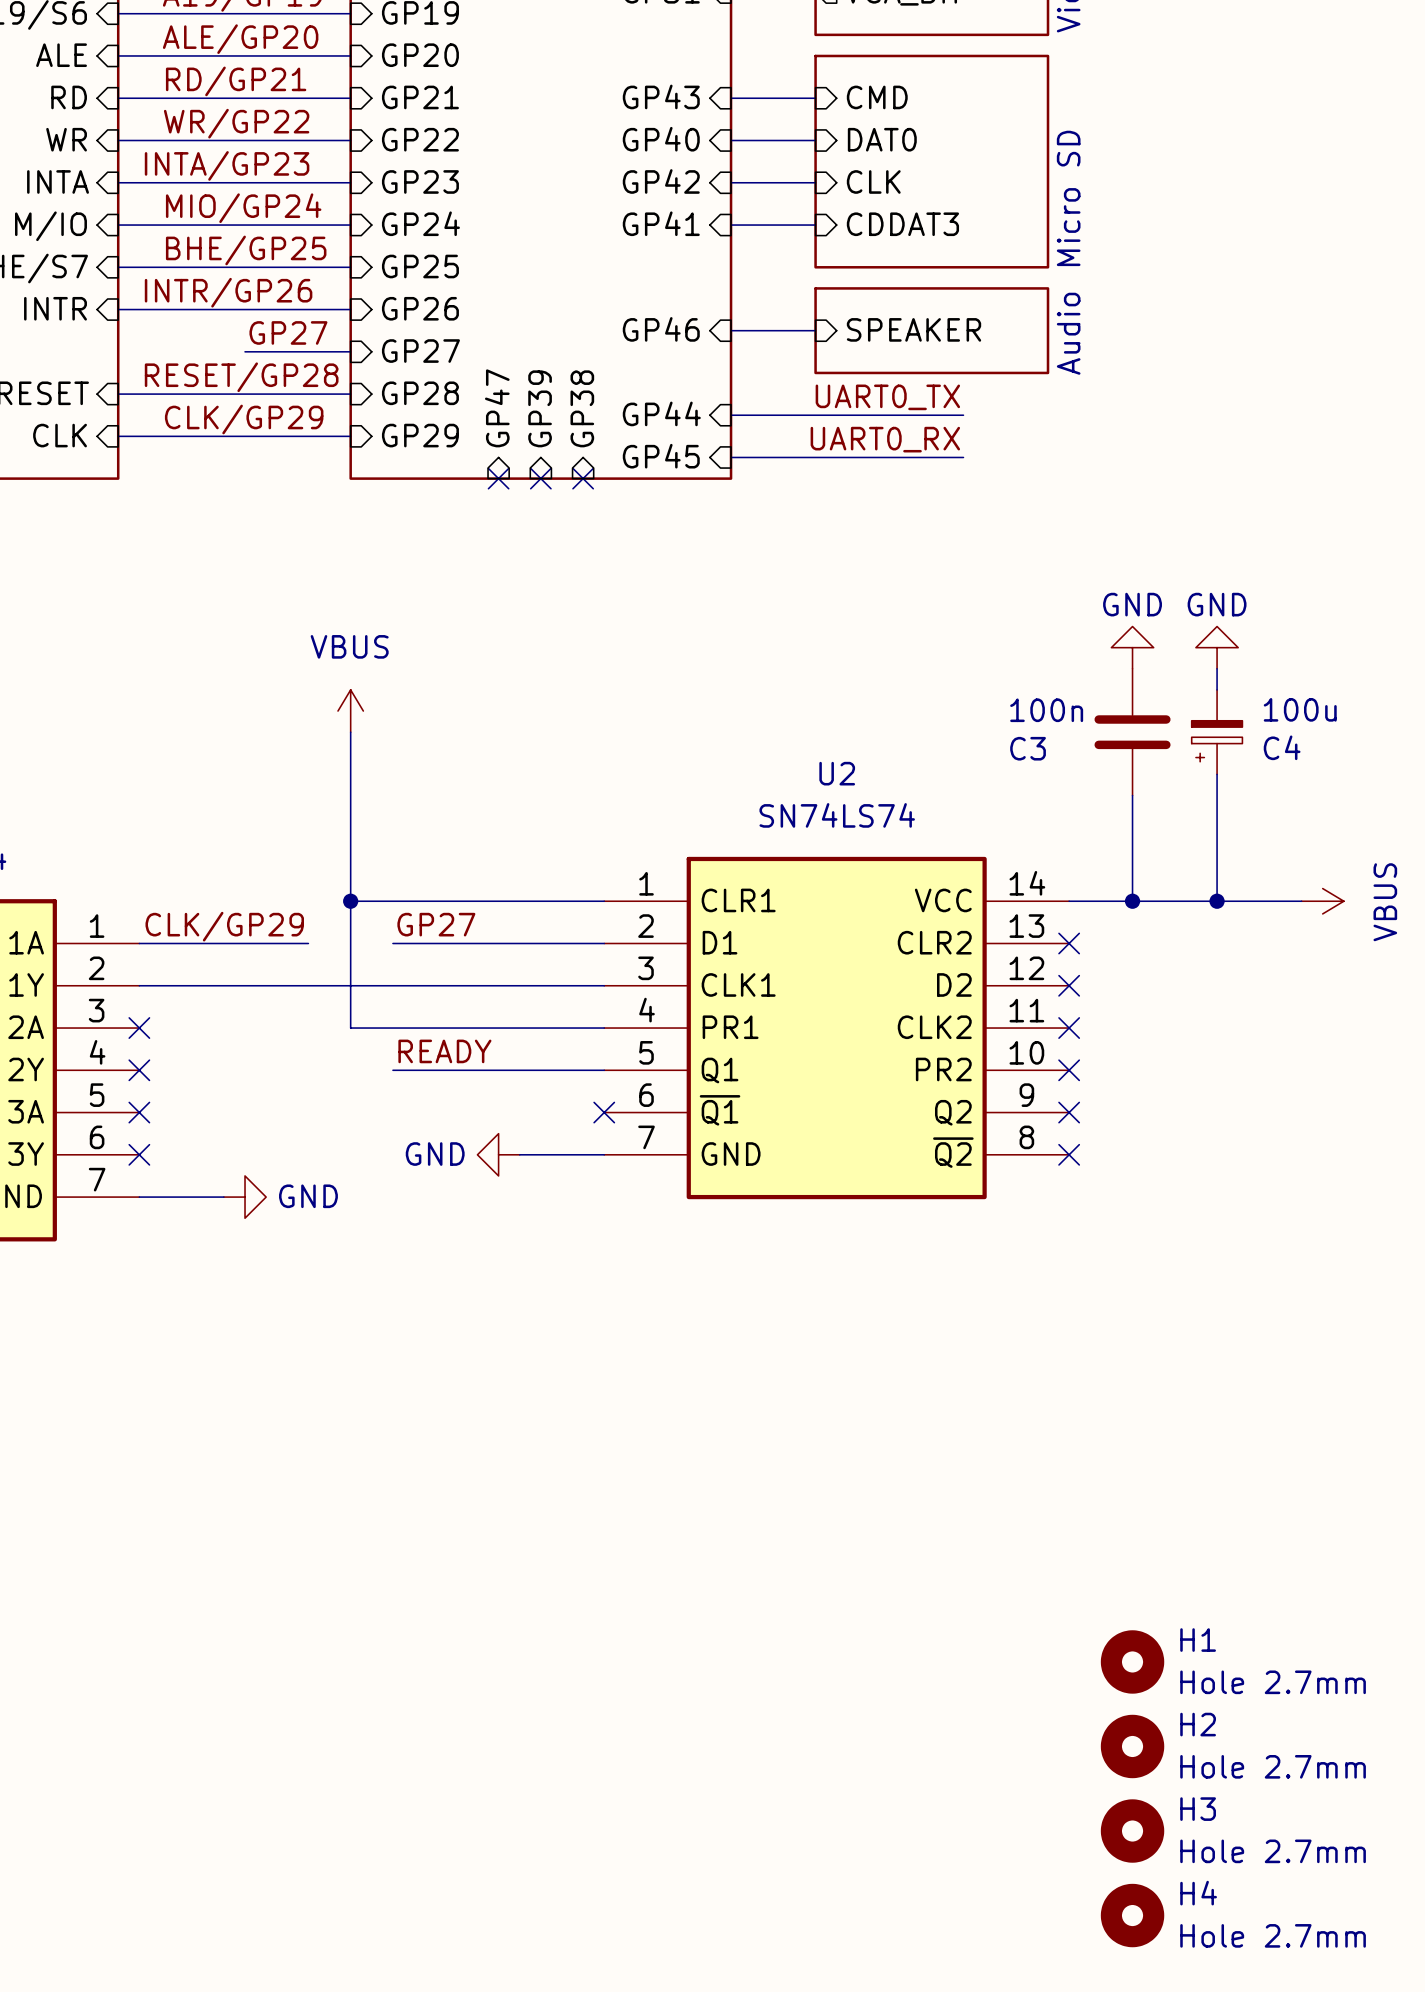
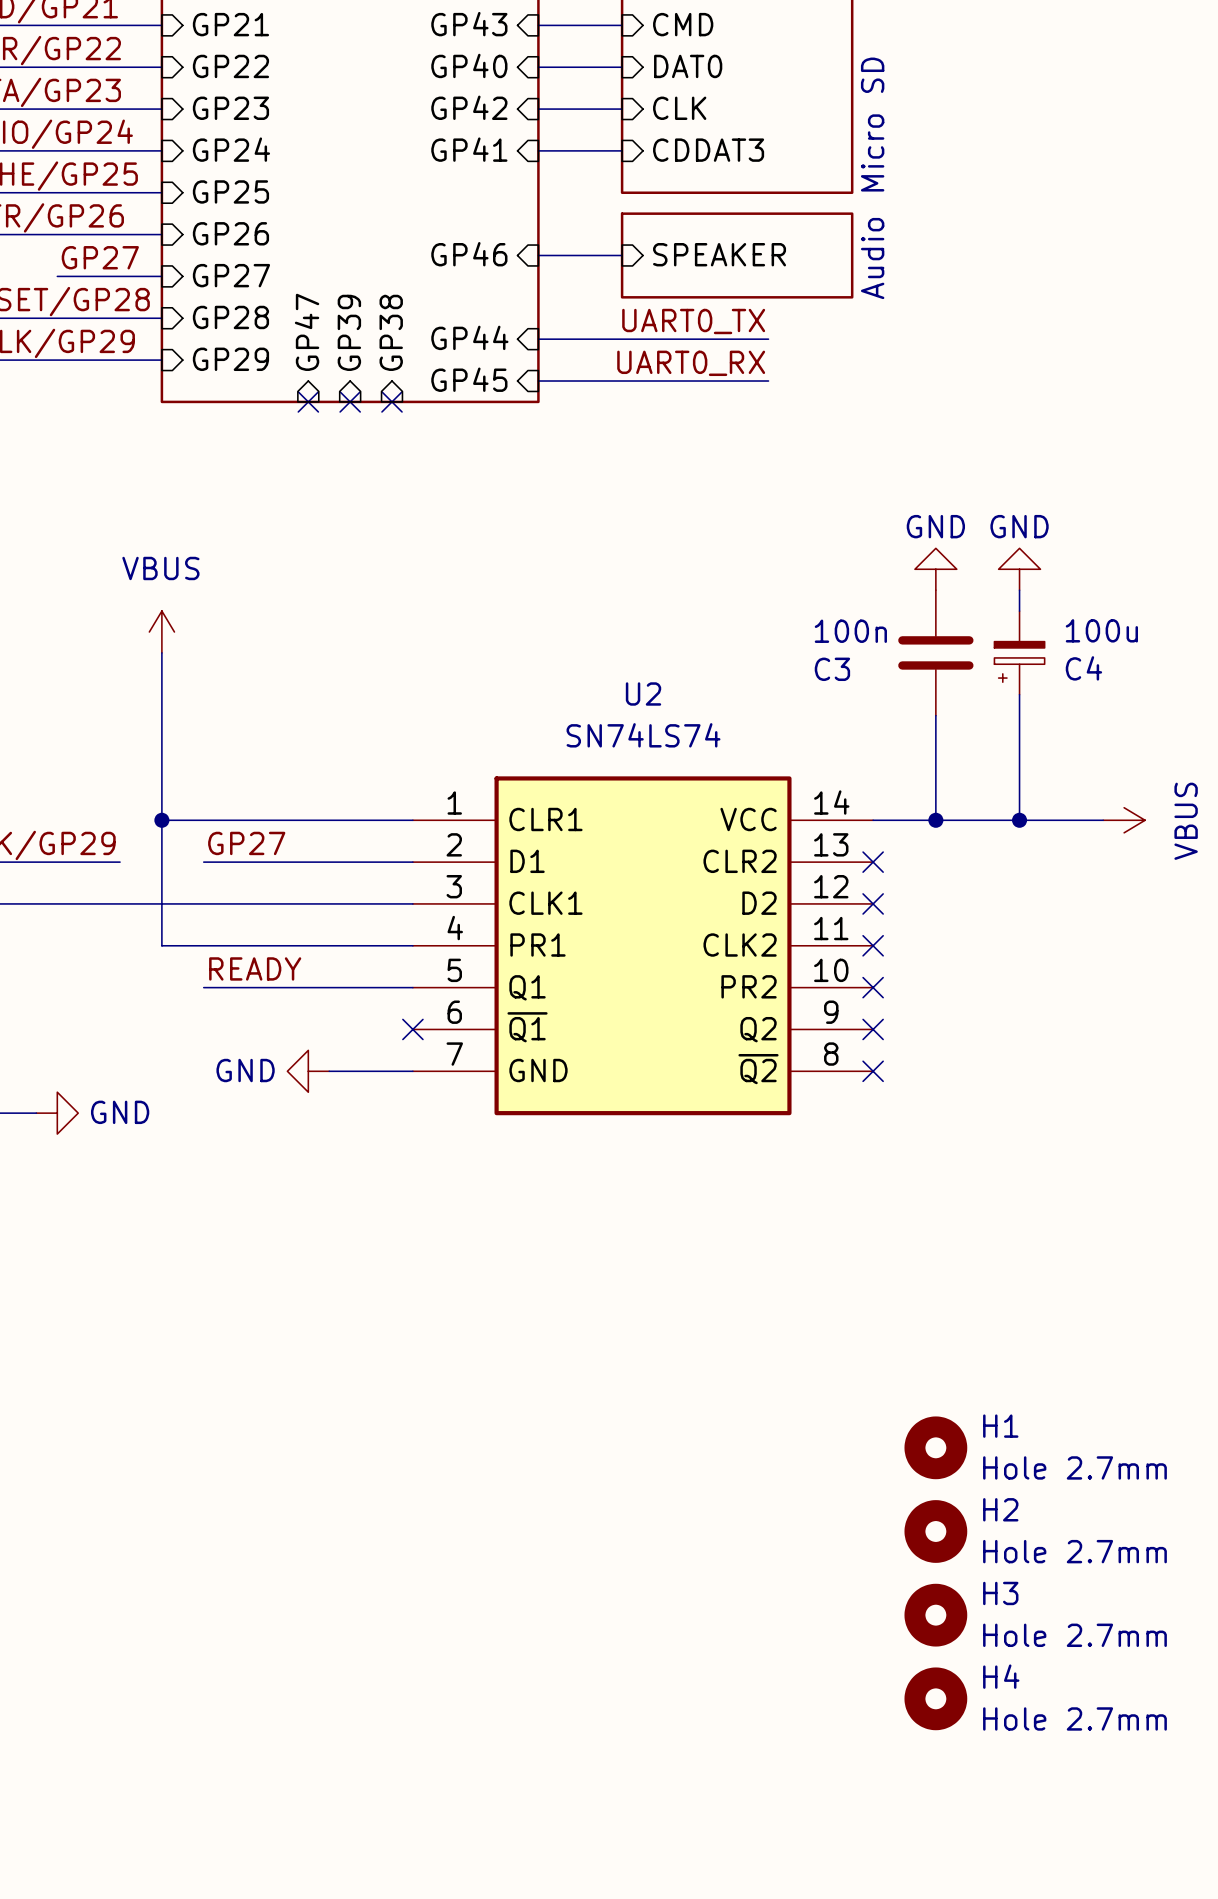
H1 position: (1132, 1661) -> (935, 1447)
H2 position: (1132, 1746) -> (935, 1531)
H3 position: (1132, 1831) -> (935, 1615)
H4 position: (1132, 1915) -> (935, 1698)

